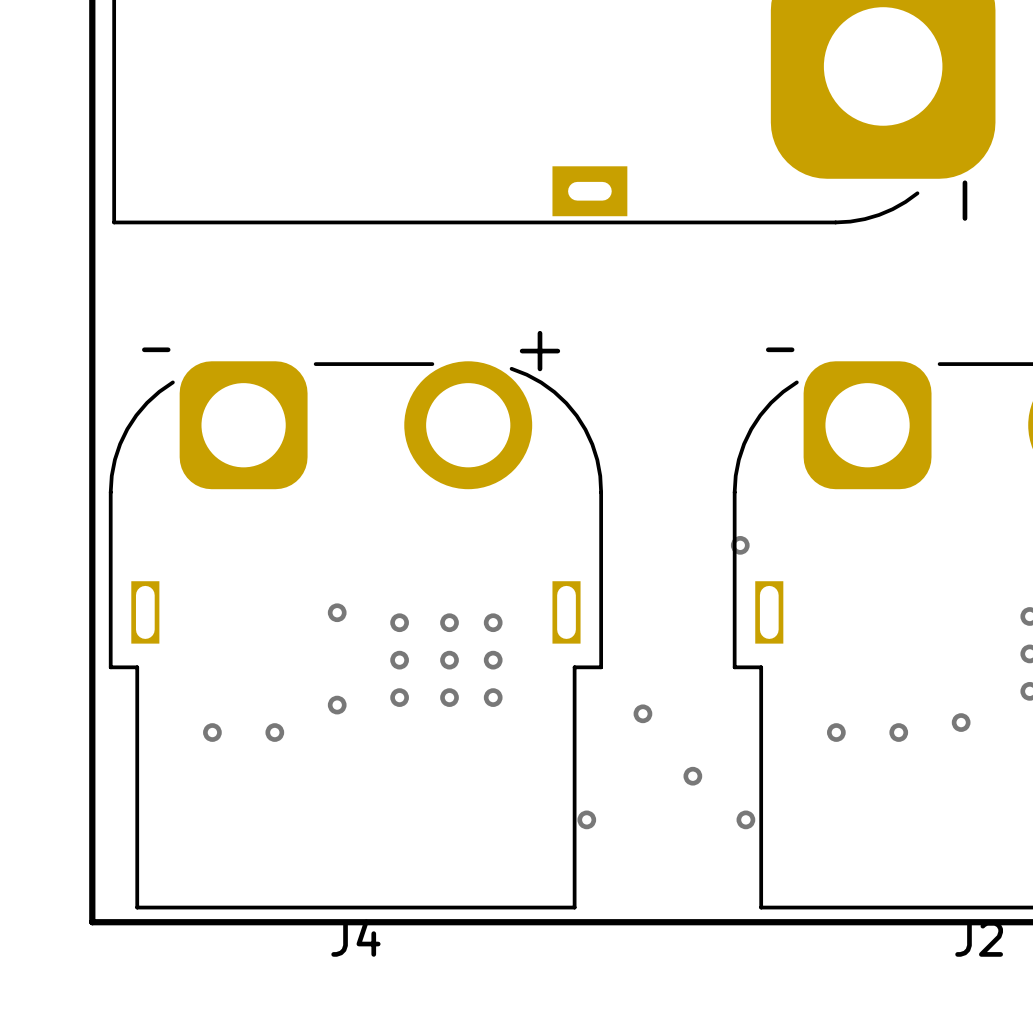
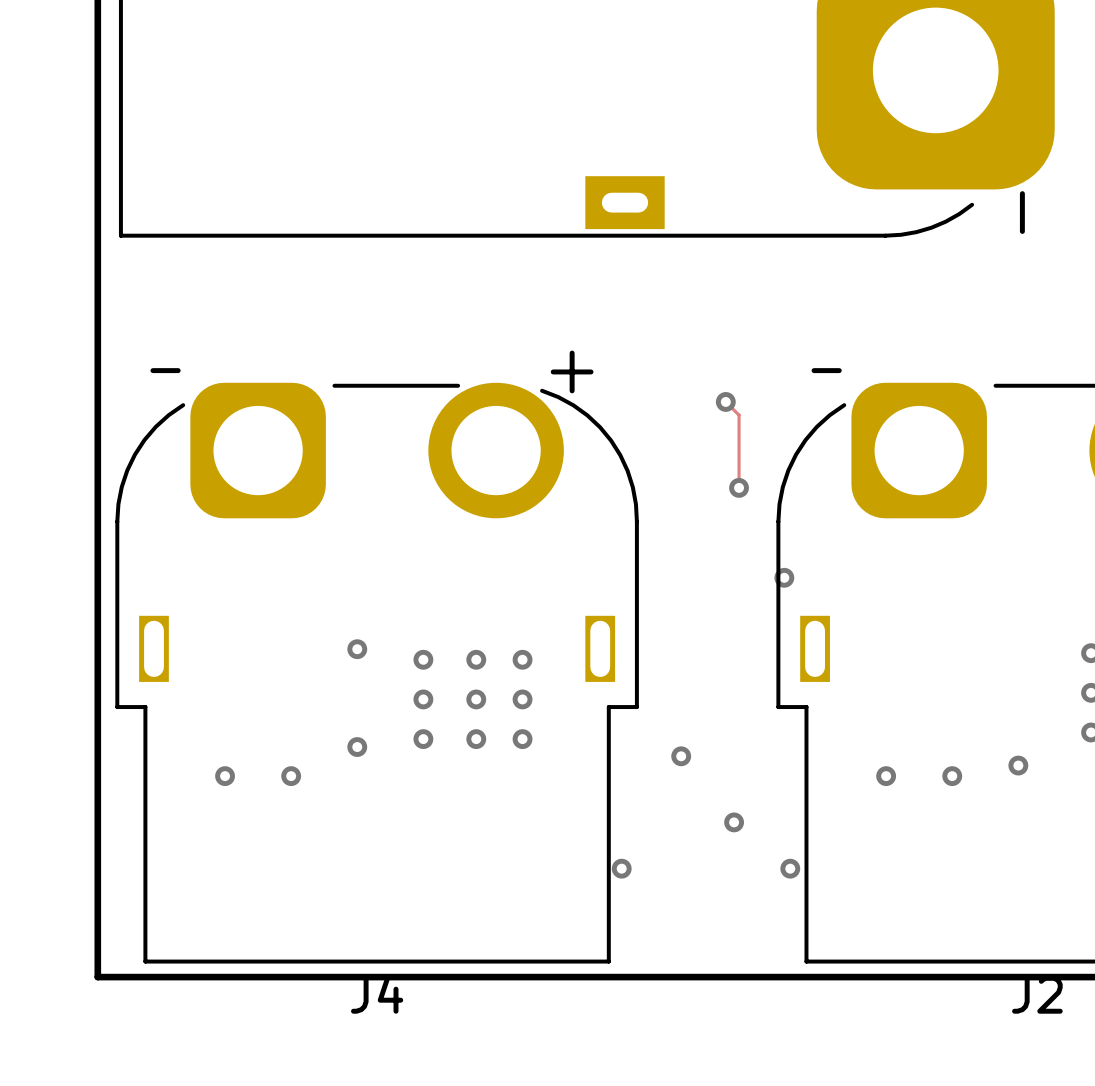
track: none -> (725, 401) (739, 415) (739, 487)
via: none -> (725, 401)
via: none -> (739, 487)

